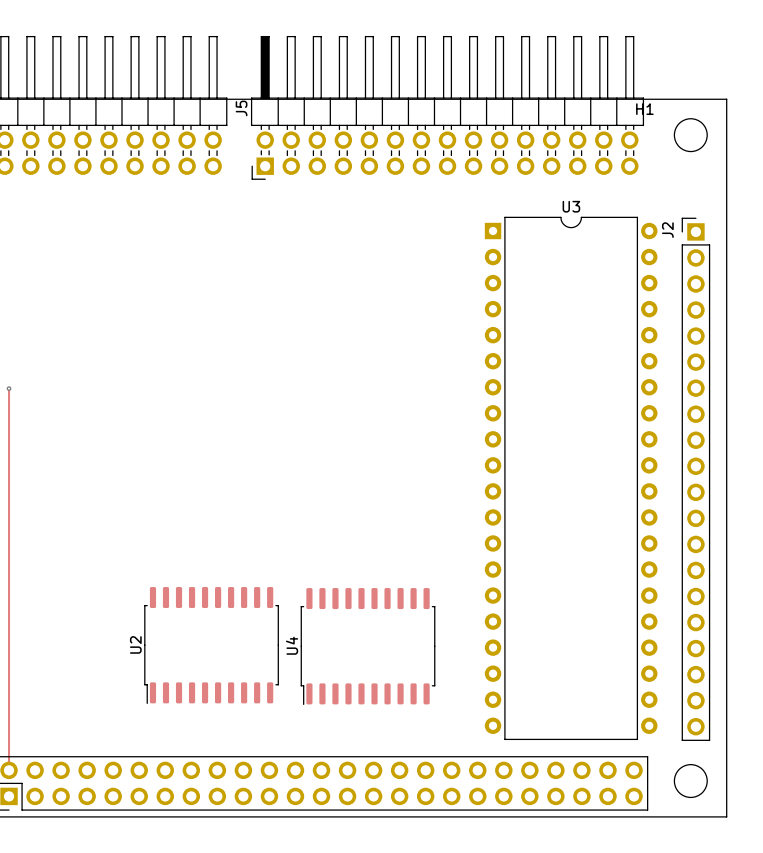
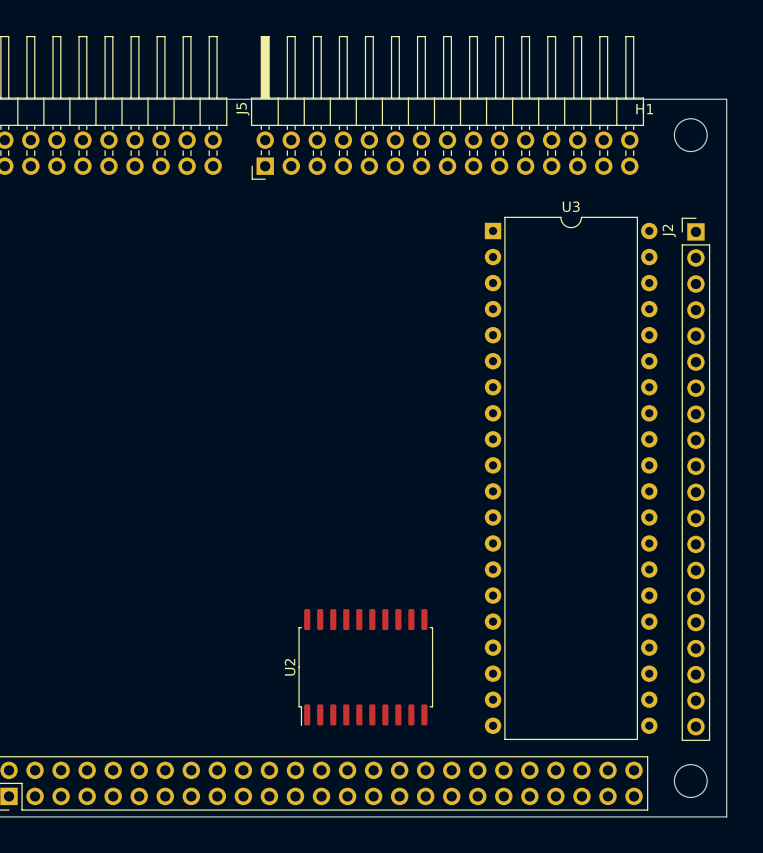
track: (9, 388) (9, 770) -> none
via: (9, 388) -> none
U2 position: (211, 645) -> (365, 667)
U4: (368, 646) -> none

